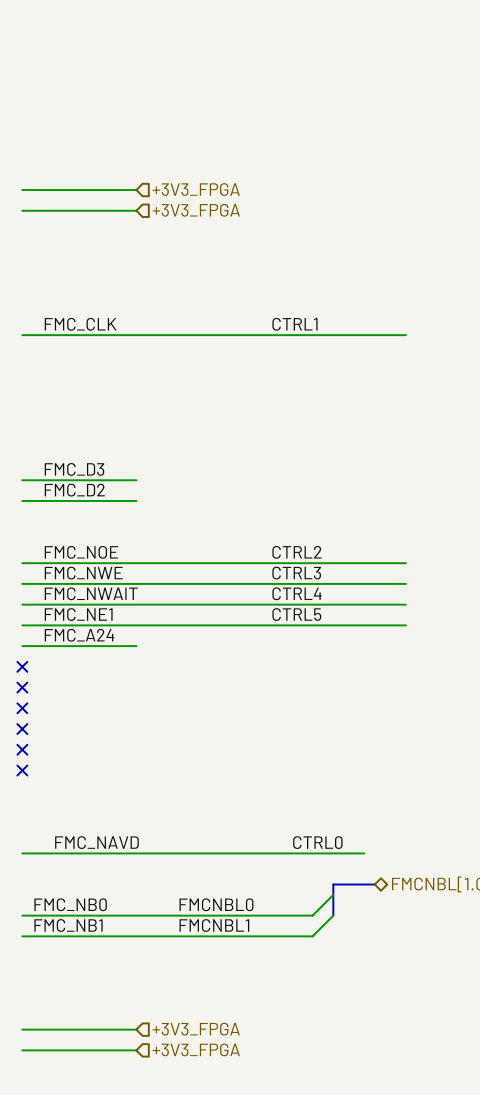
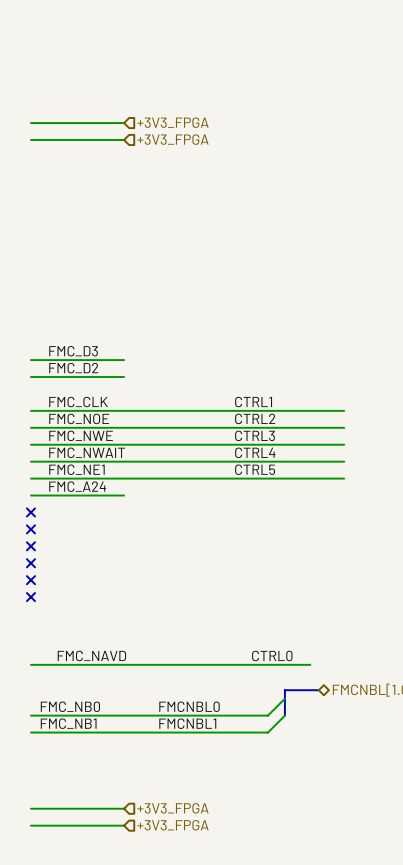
label: FMC_CLK (80, 324) -> none
label: CTRL1 (294, 324) -> none
wire: (22, 335) (405, 335) -> none
label: none -> FMC_CLK (78, 402)
label: none -> CTRL1 (253, 402)
wire: none -> (30, 410) (344, 410)

